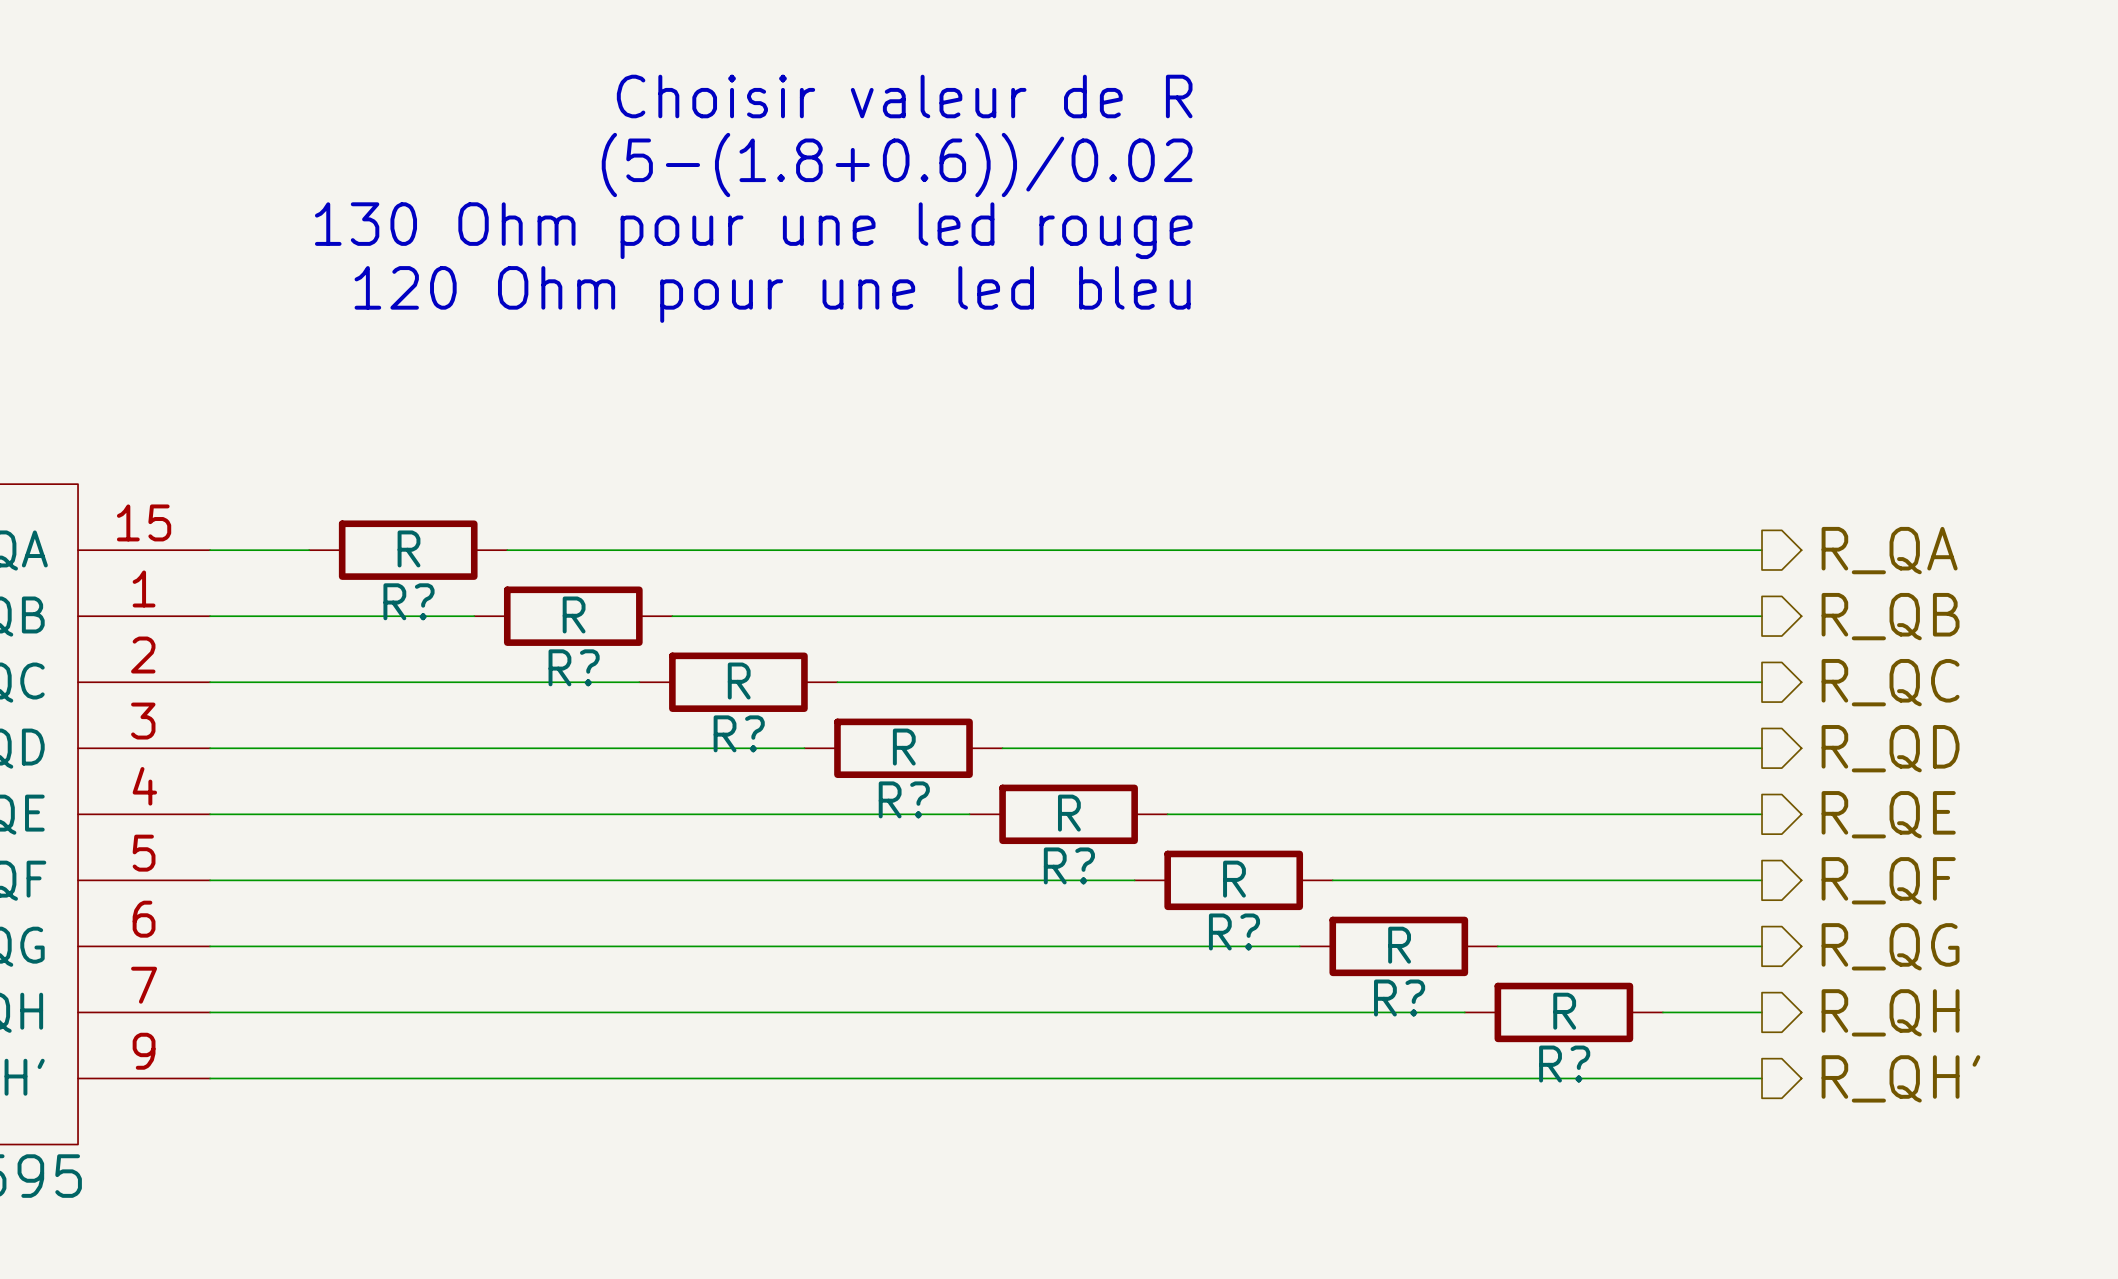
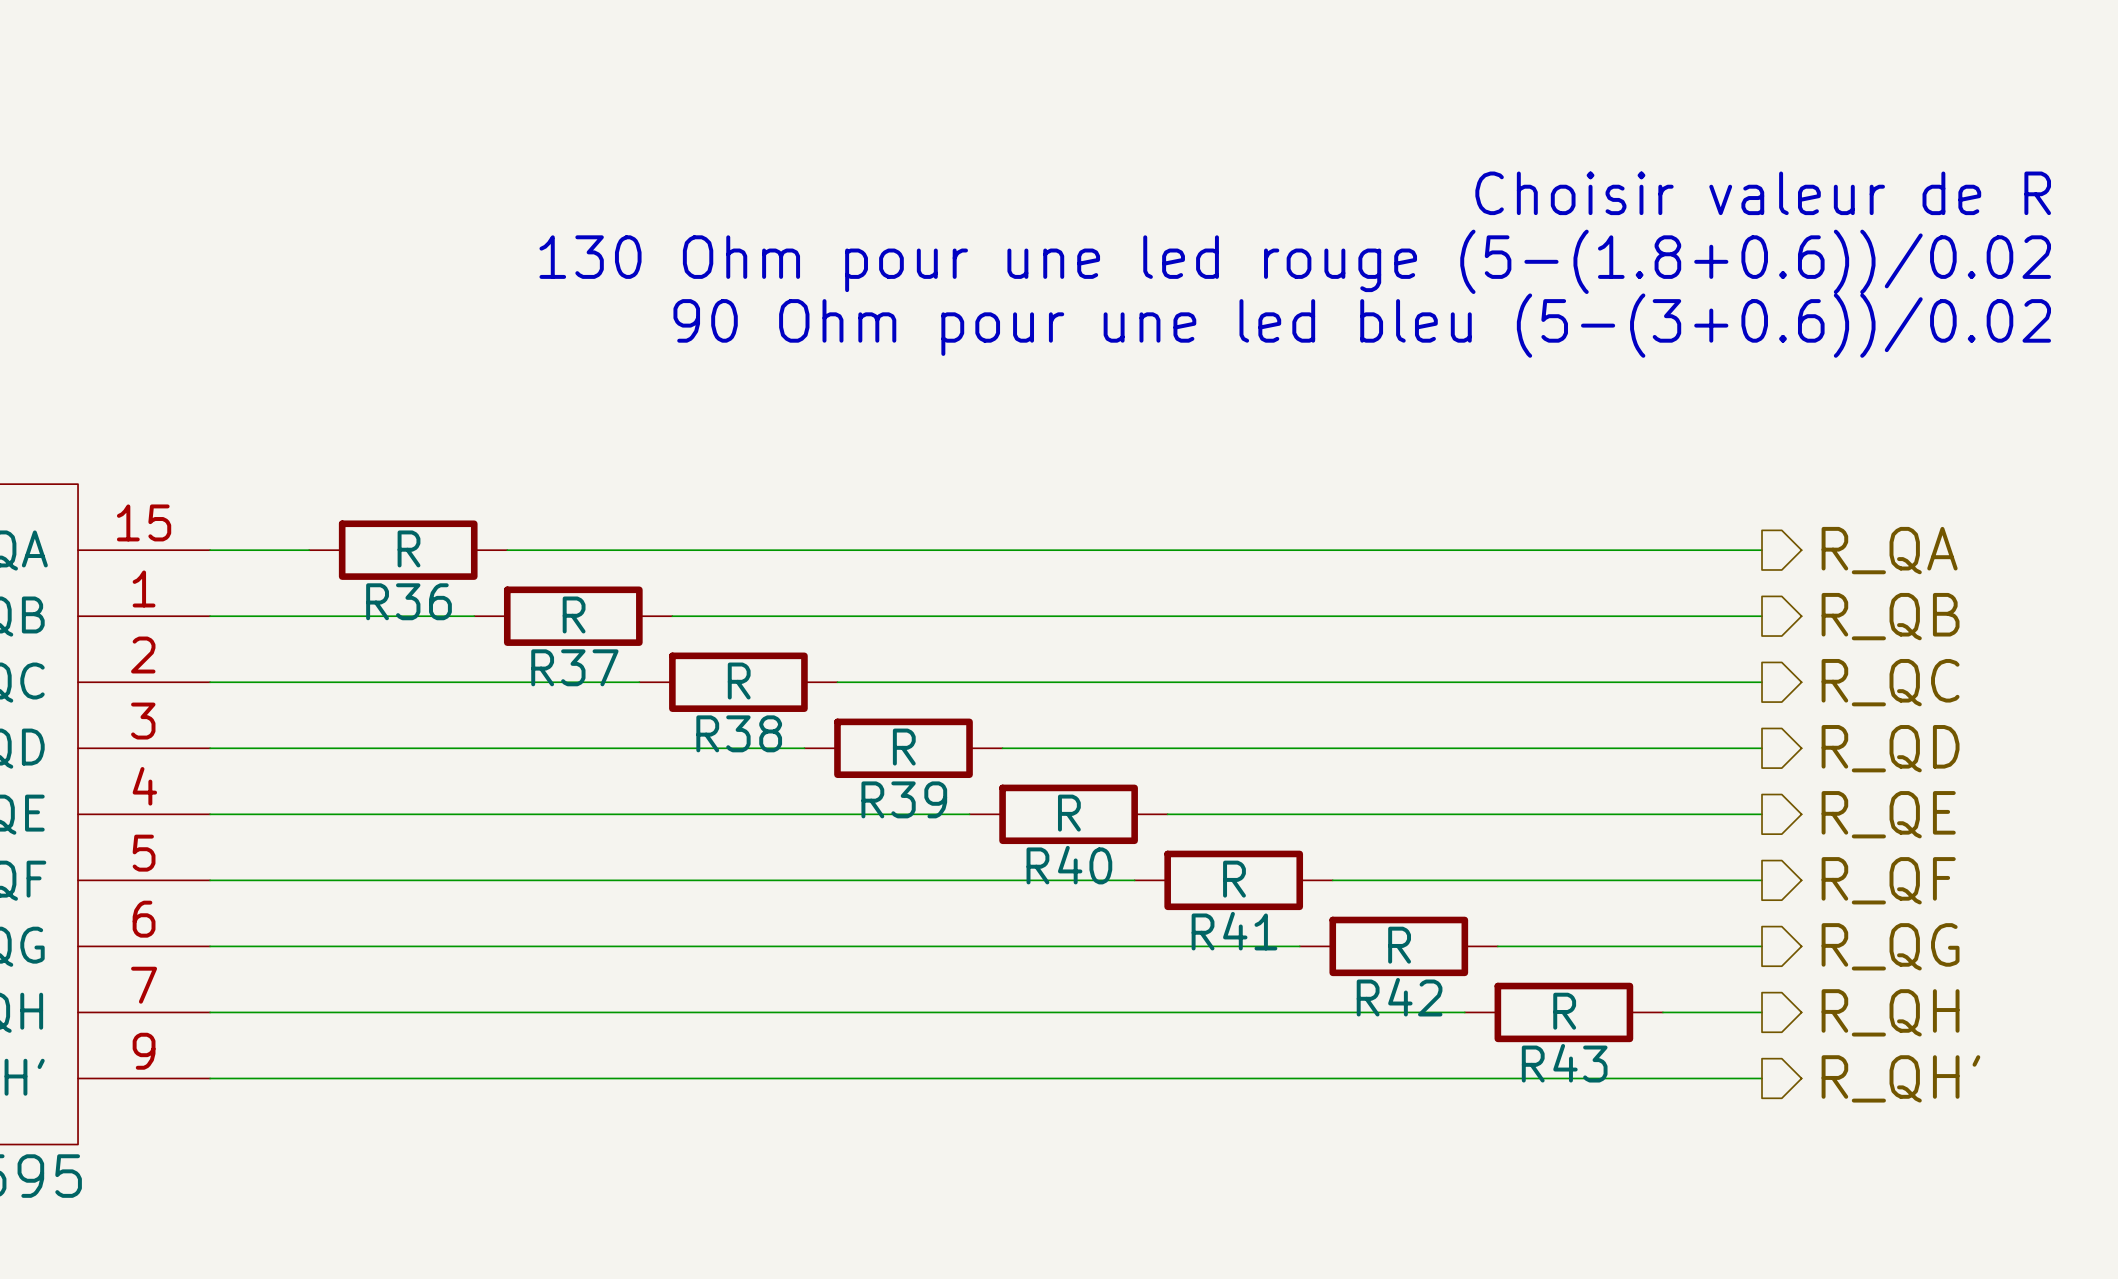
text: Choisir valeur de R (904, 96) -> none
text: (5-(1.8+0.6))/0.02 (897, 165) -> none
text: none -> Choisir valeur de R (1763, 193)
text: 130 Ohm pour une led rouge (753, 230) -> none
text: none -> 130 Ohm pour une led rouge (5-(1.8+0.6))/0.02 (1295, 261)
text: 120 Ohm pour une led bleu (772, 294) -> none
text: none -> 90 Ohm pour une led bleu (5-(3+0.6))/0.02 (1362, 325)
R? name: R? (409, 601) -> R36 (409, 601)
R? name: R? (574, 667) -> R37 (574, 667)
R? name: R? (739, 733) -> R38 (739, 733)
R? name: R? (904, 799) -> R39 (904, 799)
R? name: R? (1069, 865) -> R40 (1069, 865)
R? name: R? (1234, 931) -> R41 (1234, 931)
R? name: R? (1399, 998) -> R42 (1399, 997)
R? name: R? (1564, 1064) -> R43 (1564, 1063)

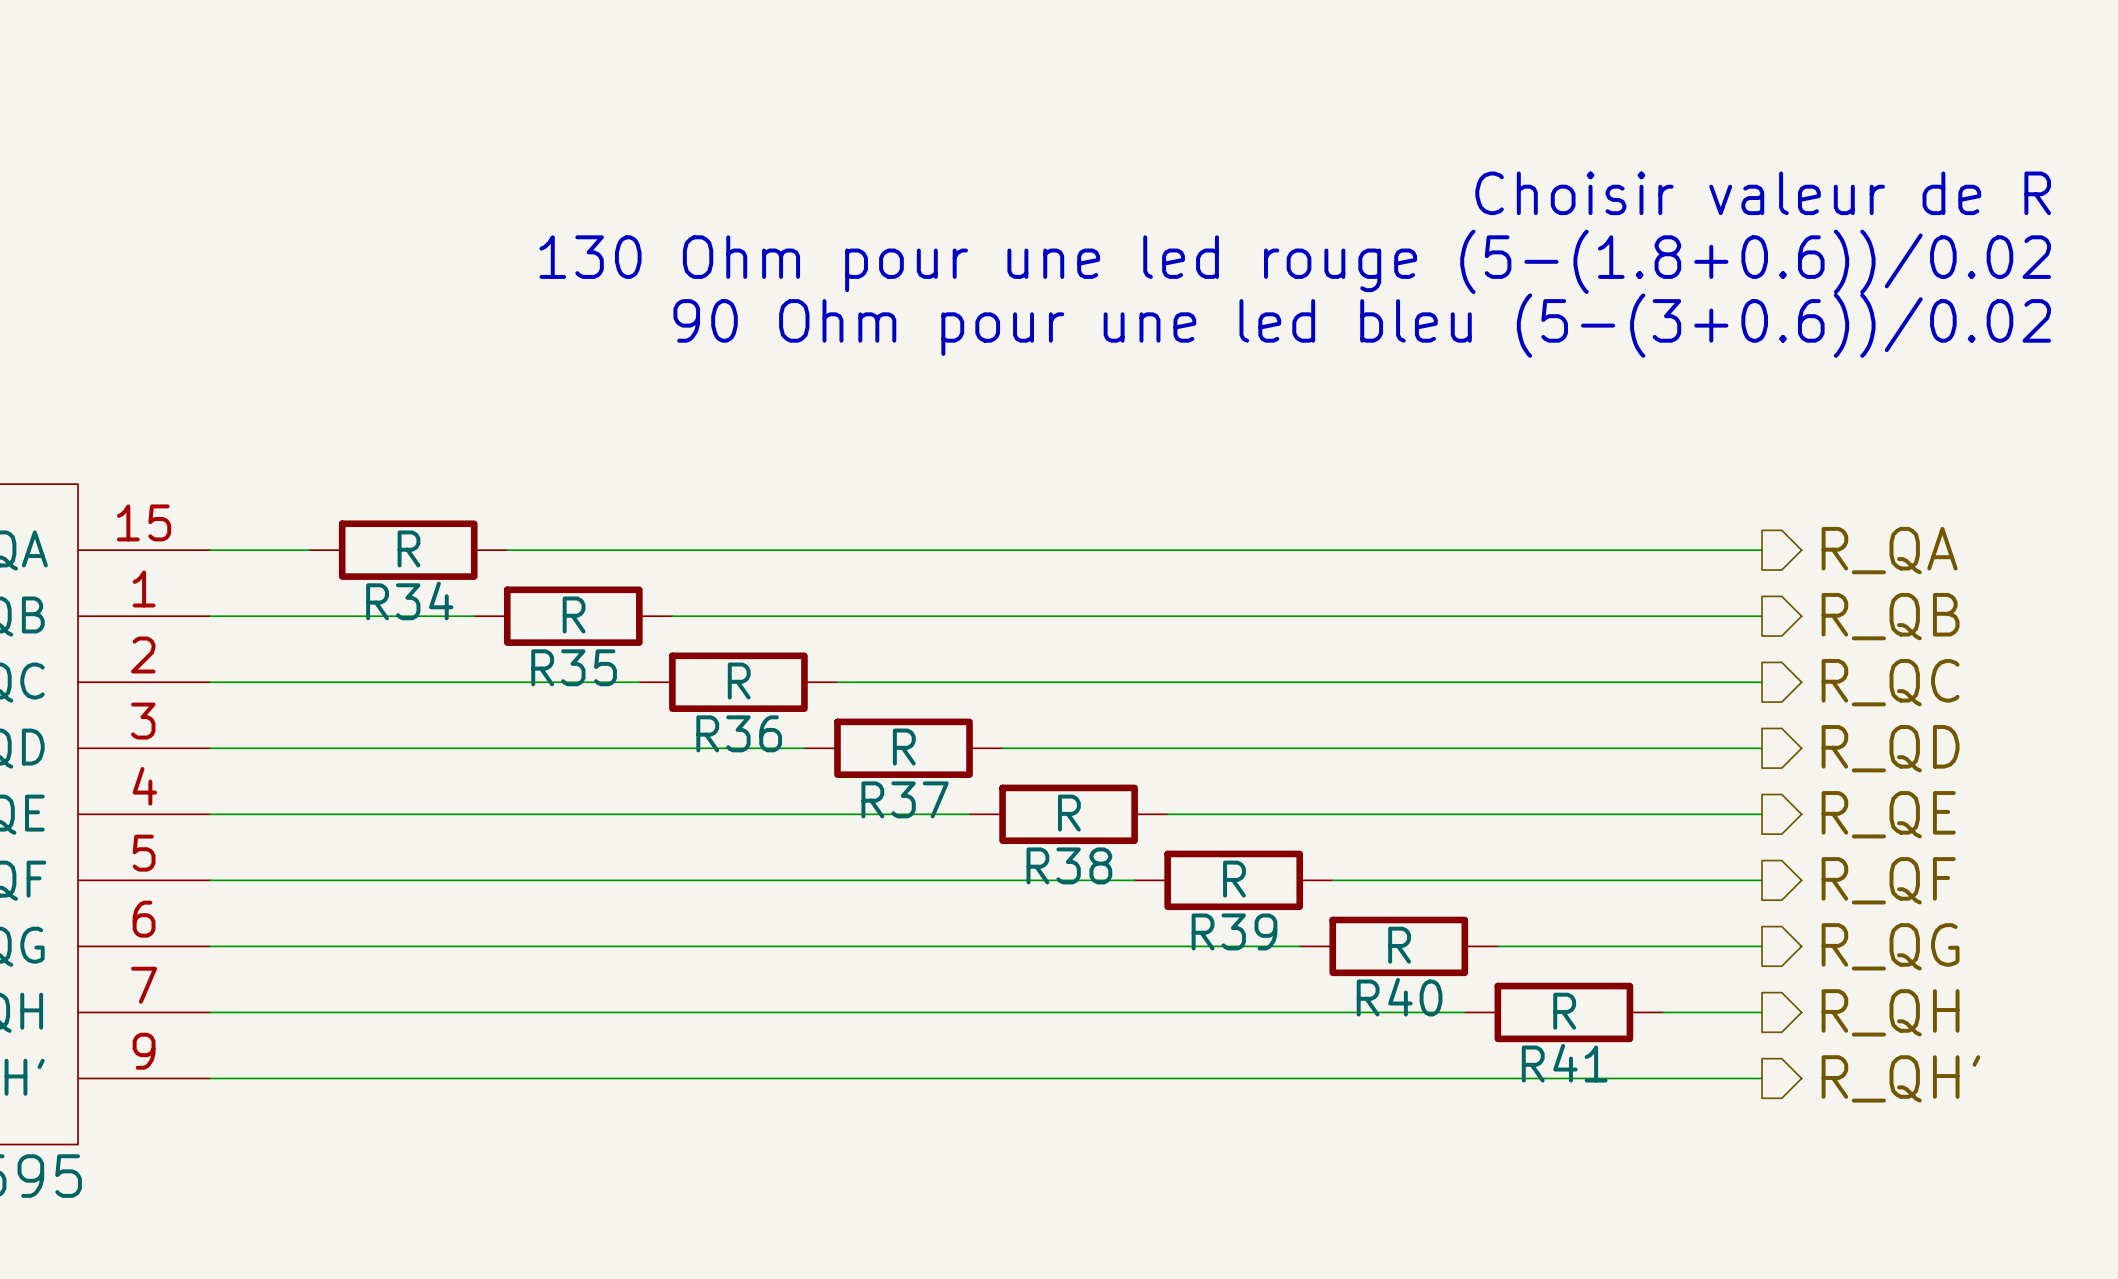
R36 name: R36 (409, 601) -> R34 (409, 600)
R37 name: R37 (574, 667) -> R35 (574, 667)
R38 name: R38 (739, 733) -> R36 (739, 733)
R39 name: R39 (904, 799) -> R37 (905, 799)
R40 name: R40 (1069, 865) -> R38 (1069, 865)
R41 name: R41 (1234, 931) -> R39 (1234, 931)
R42 name: R42 (1399, 997) -> R40 (1399, 997)
R43 name: R43 (1564, 1063) -> R41 (1564, 1063)

